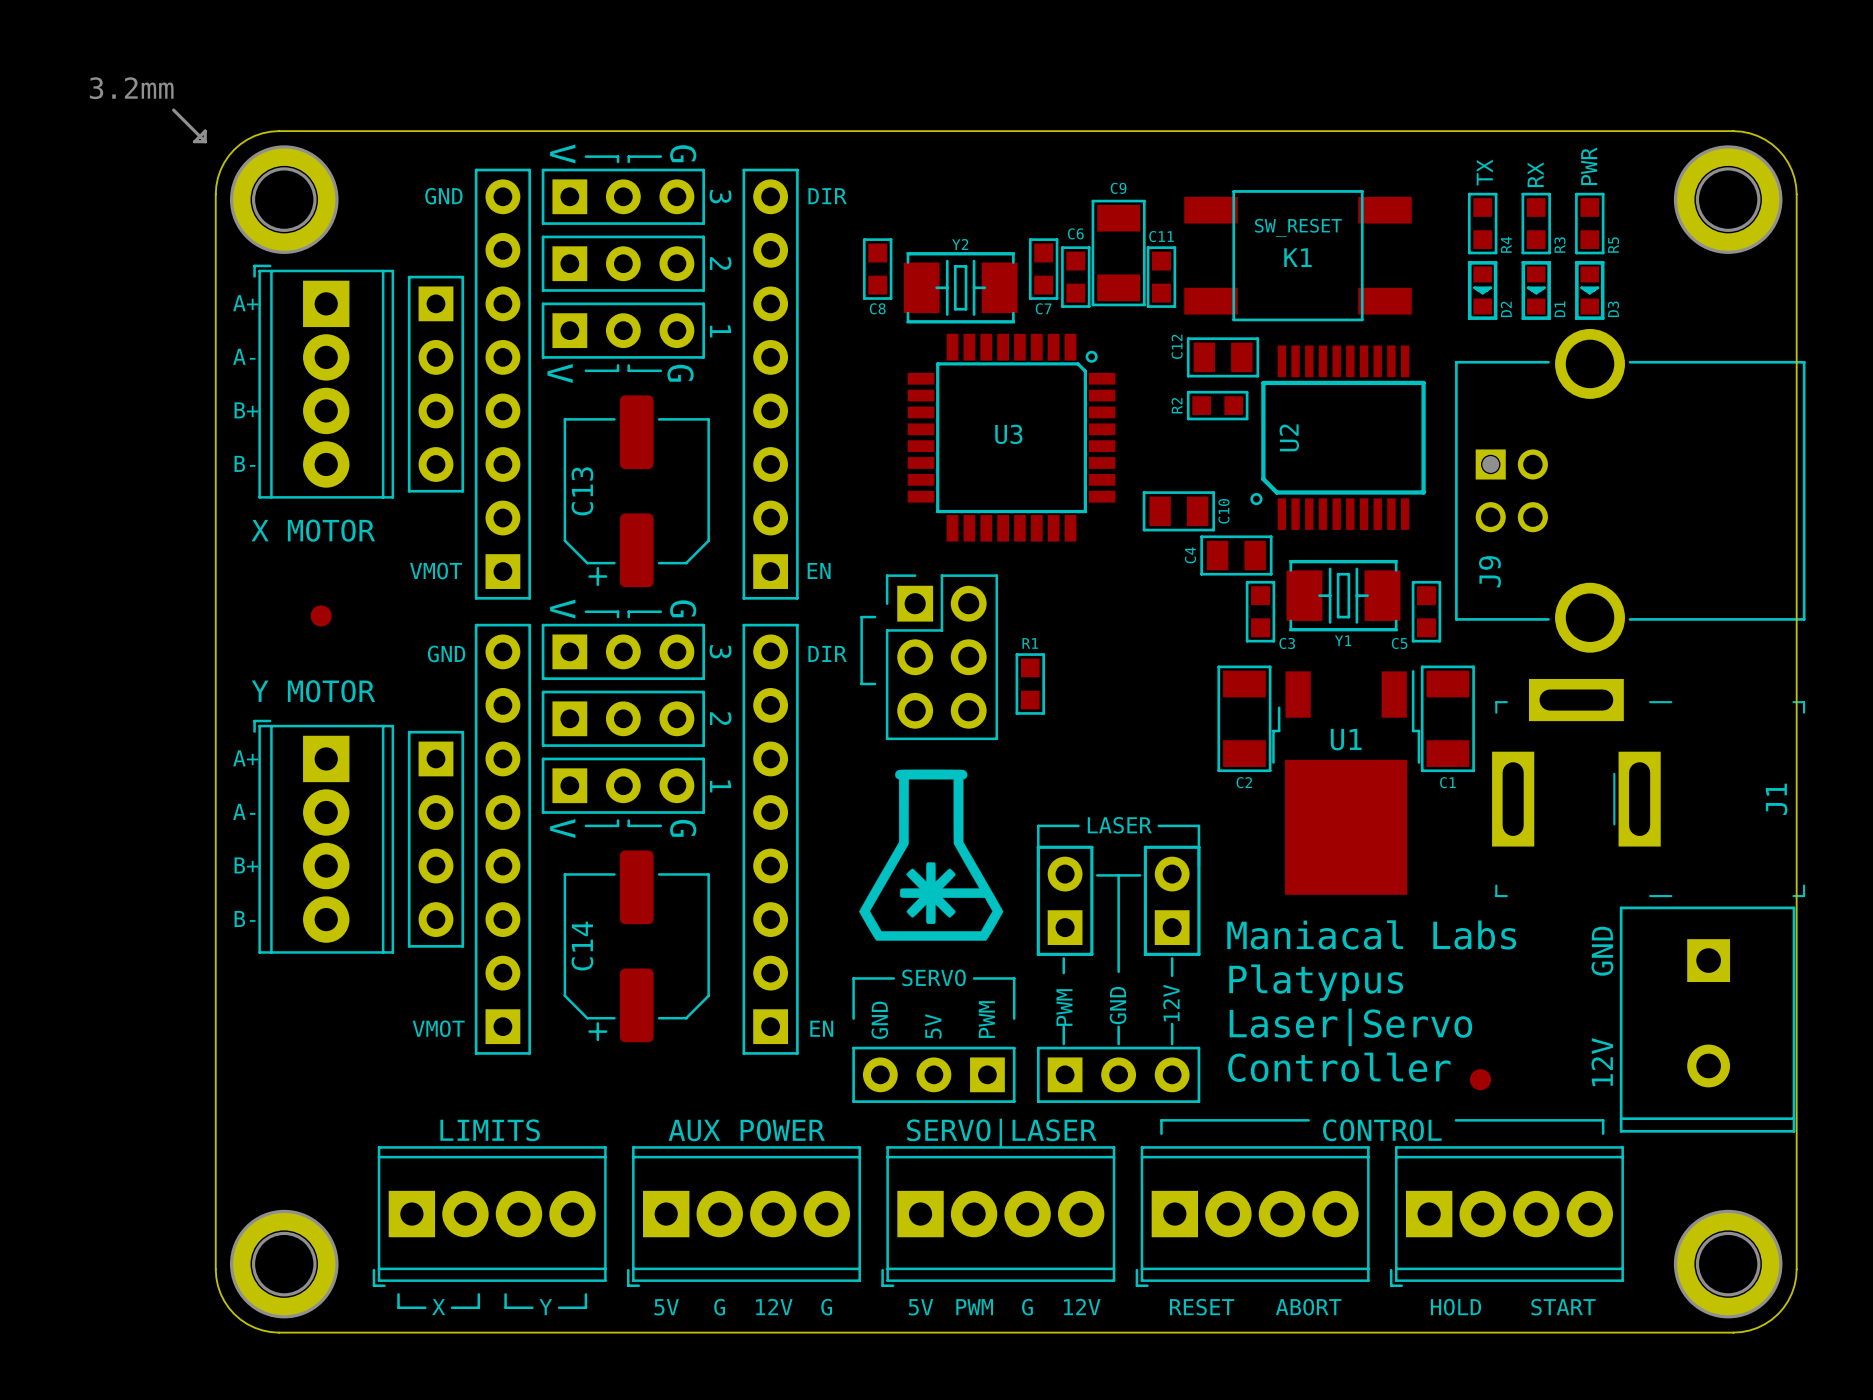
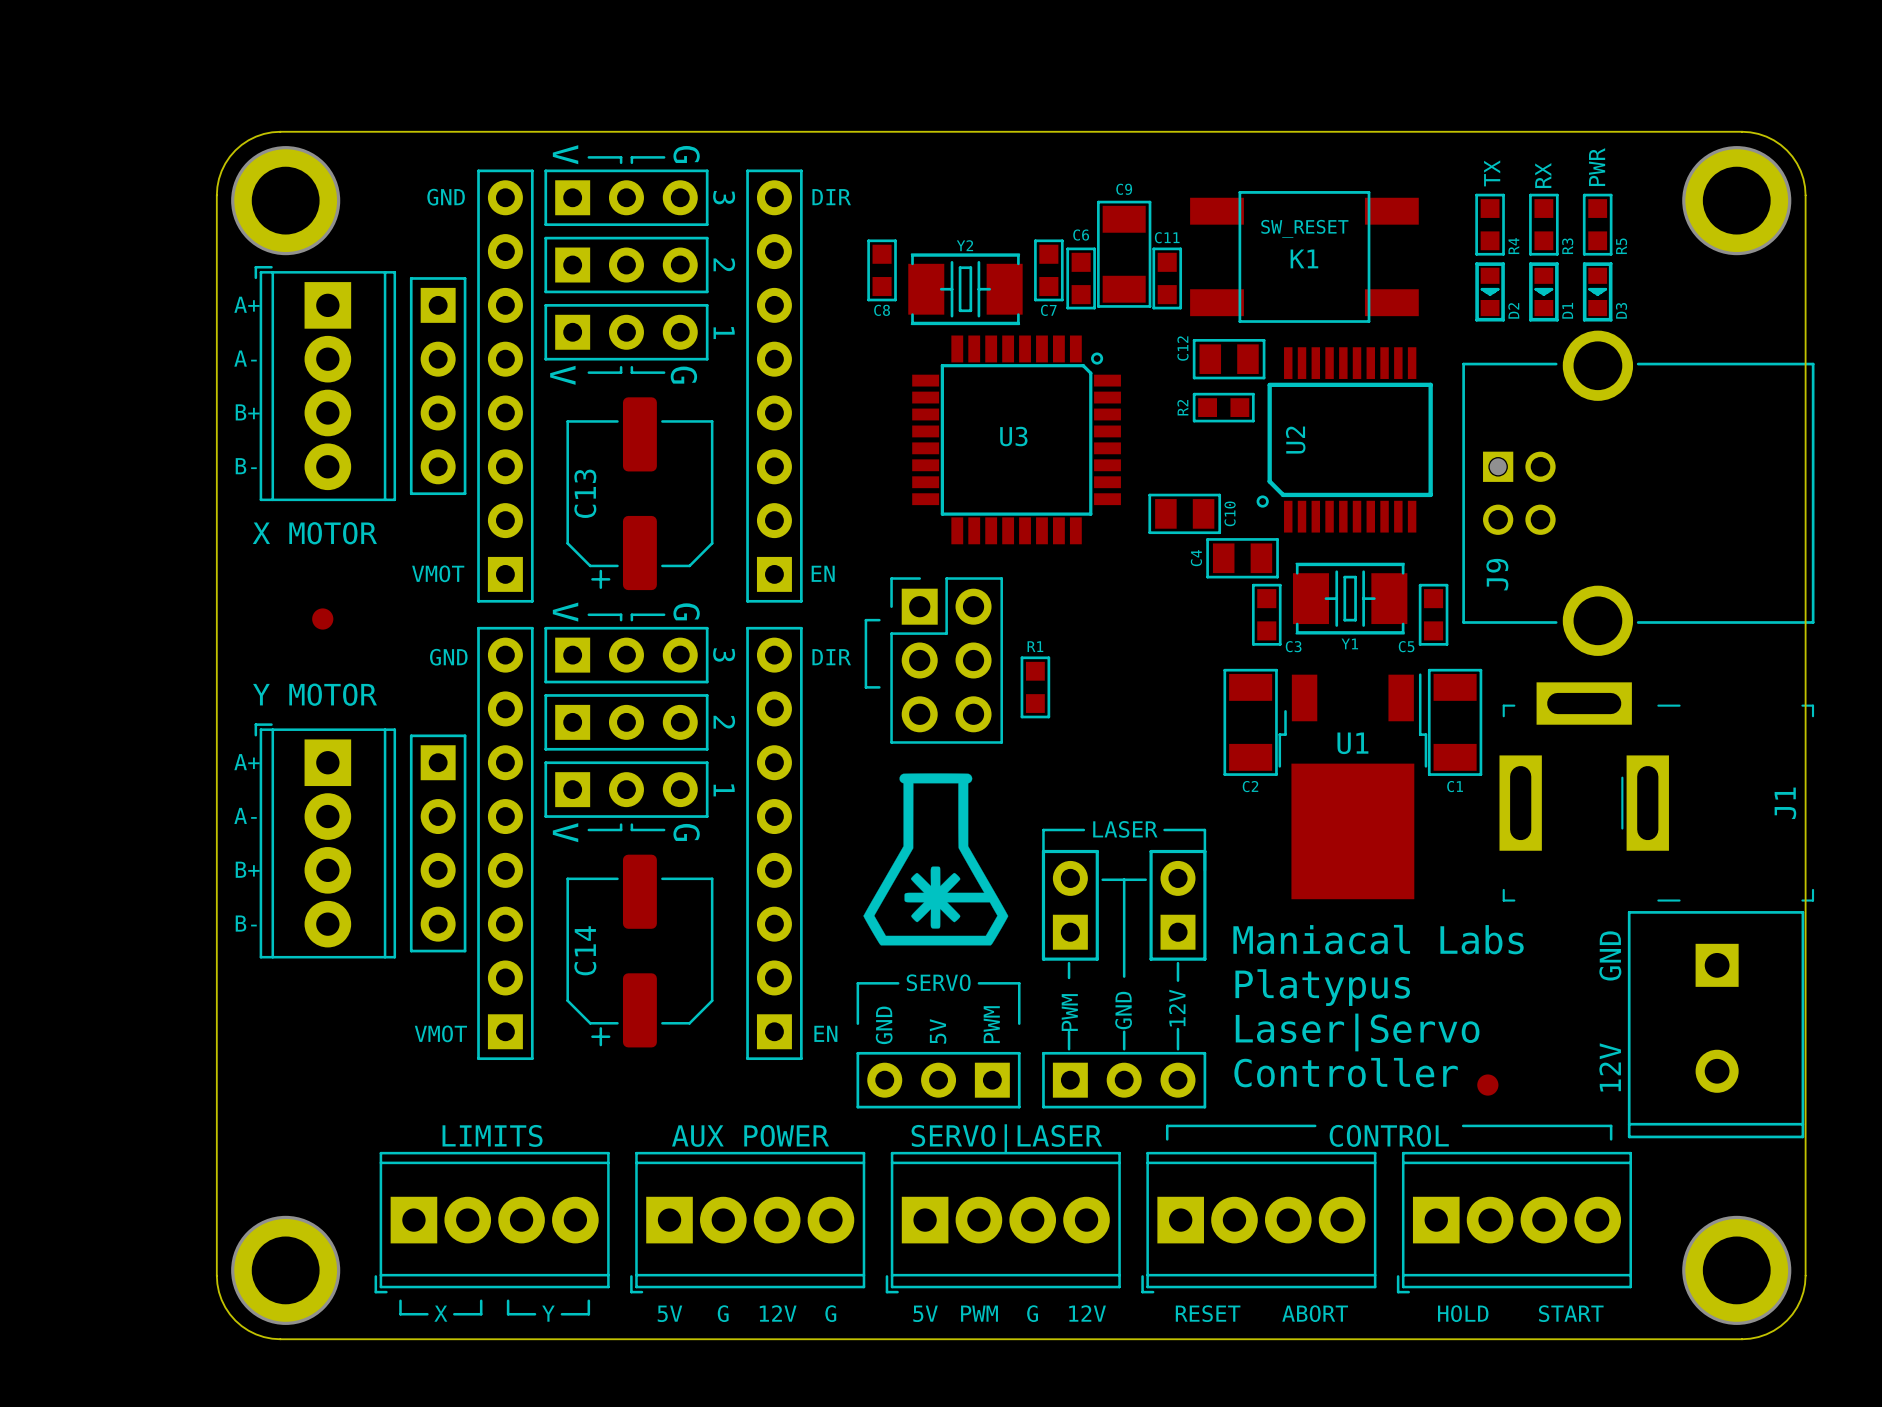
text: 3.2mm (131, 88) -> none
line: (173, 110) (205, 141) -> none
line: (205, 141) (194, 141) (205, 131) (205, 141) -> none
drawing: [251, 167, 317, 232] -> none
drawing: [1695, 167, 1761, 232] -> none
drawing: [251, 1231, 317, 1297] -> none
drawing: [1695, 1231, 1761, 1297] -> none

